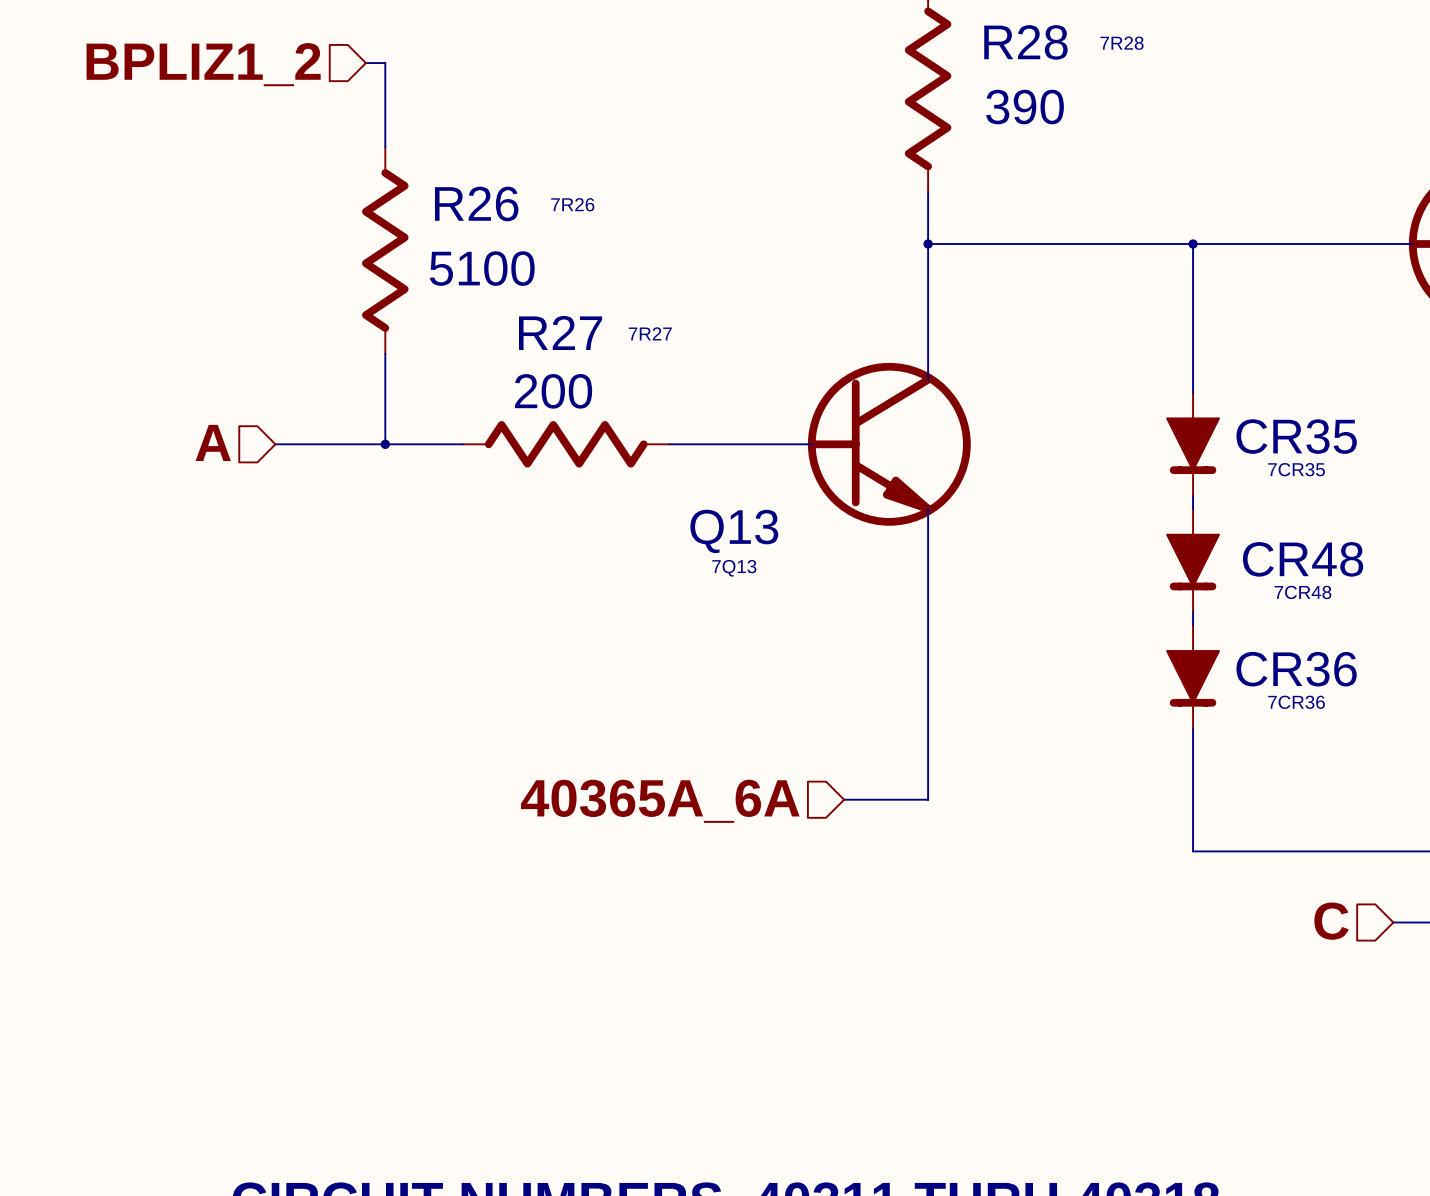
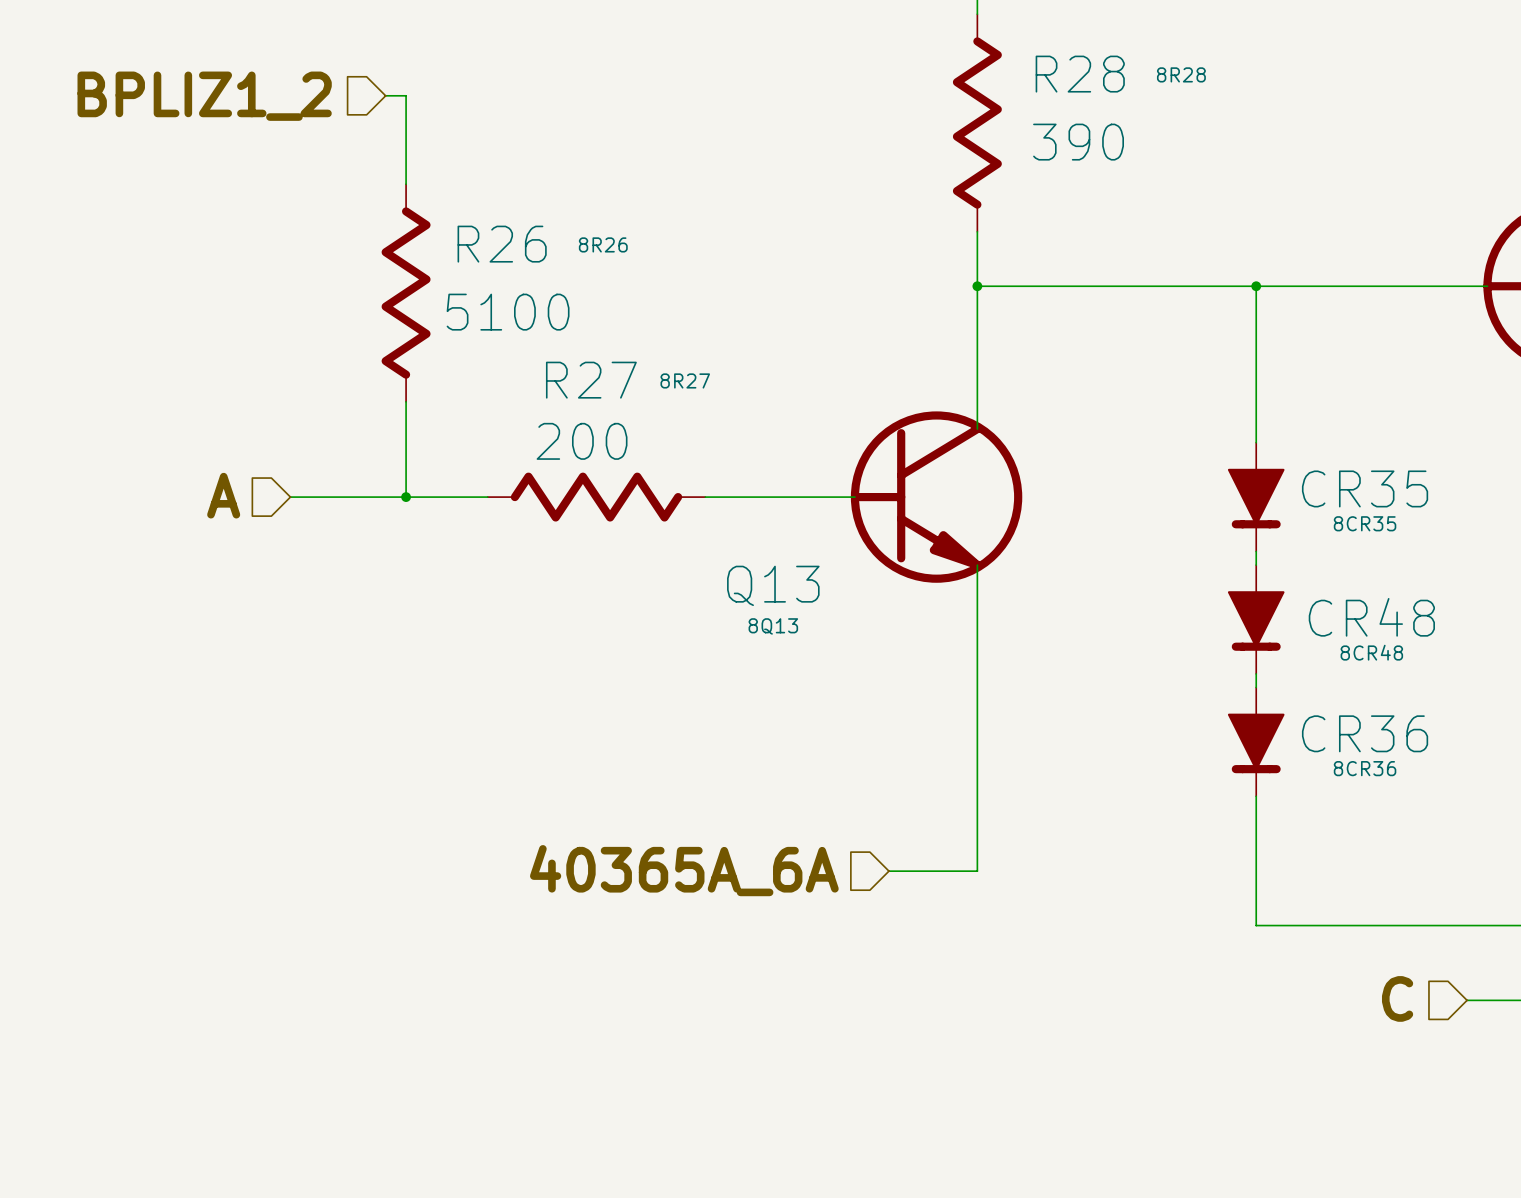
7R28 name: 7R28 (1122, 43) -> 8R28 (1181, 74)
7R26 name: 7R26 (572, 204) -> 8R26 (603, 244)
7R27 name: 7R27 (650, 333) -> 8R27 (685, 380)
7CR35 name: 7CR35 (1296, 469) -> 8CR35 (1365, 523)
7Q13 name: 7Q13 (734, 568) -> 8Q13 (773, 626)
7CR48 name: 7CR48 (1302, 592) -> 8CR48 (1371, 652)
7CR36 name: 7CR36 (1296, 702) -> 8CR36 (1365, 768)

